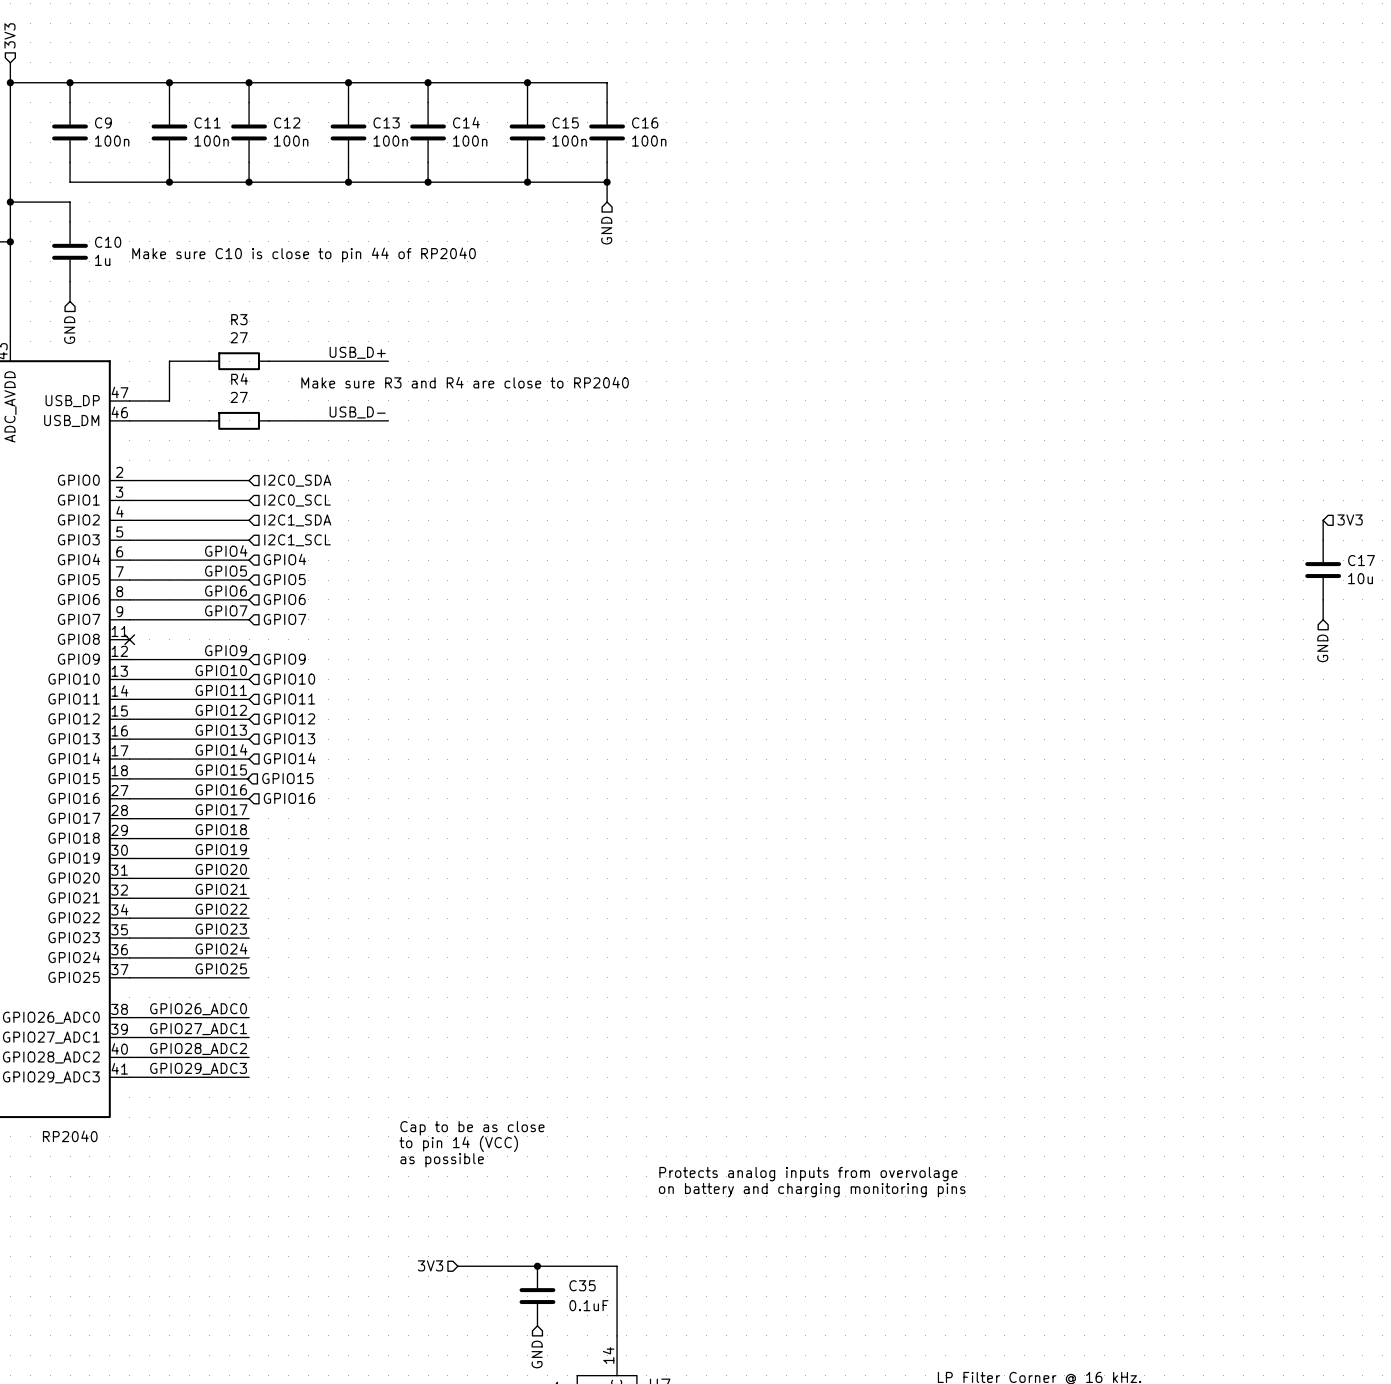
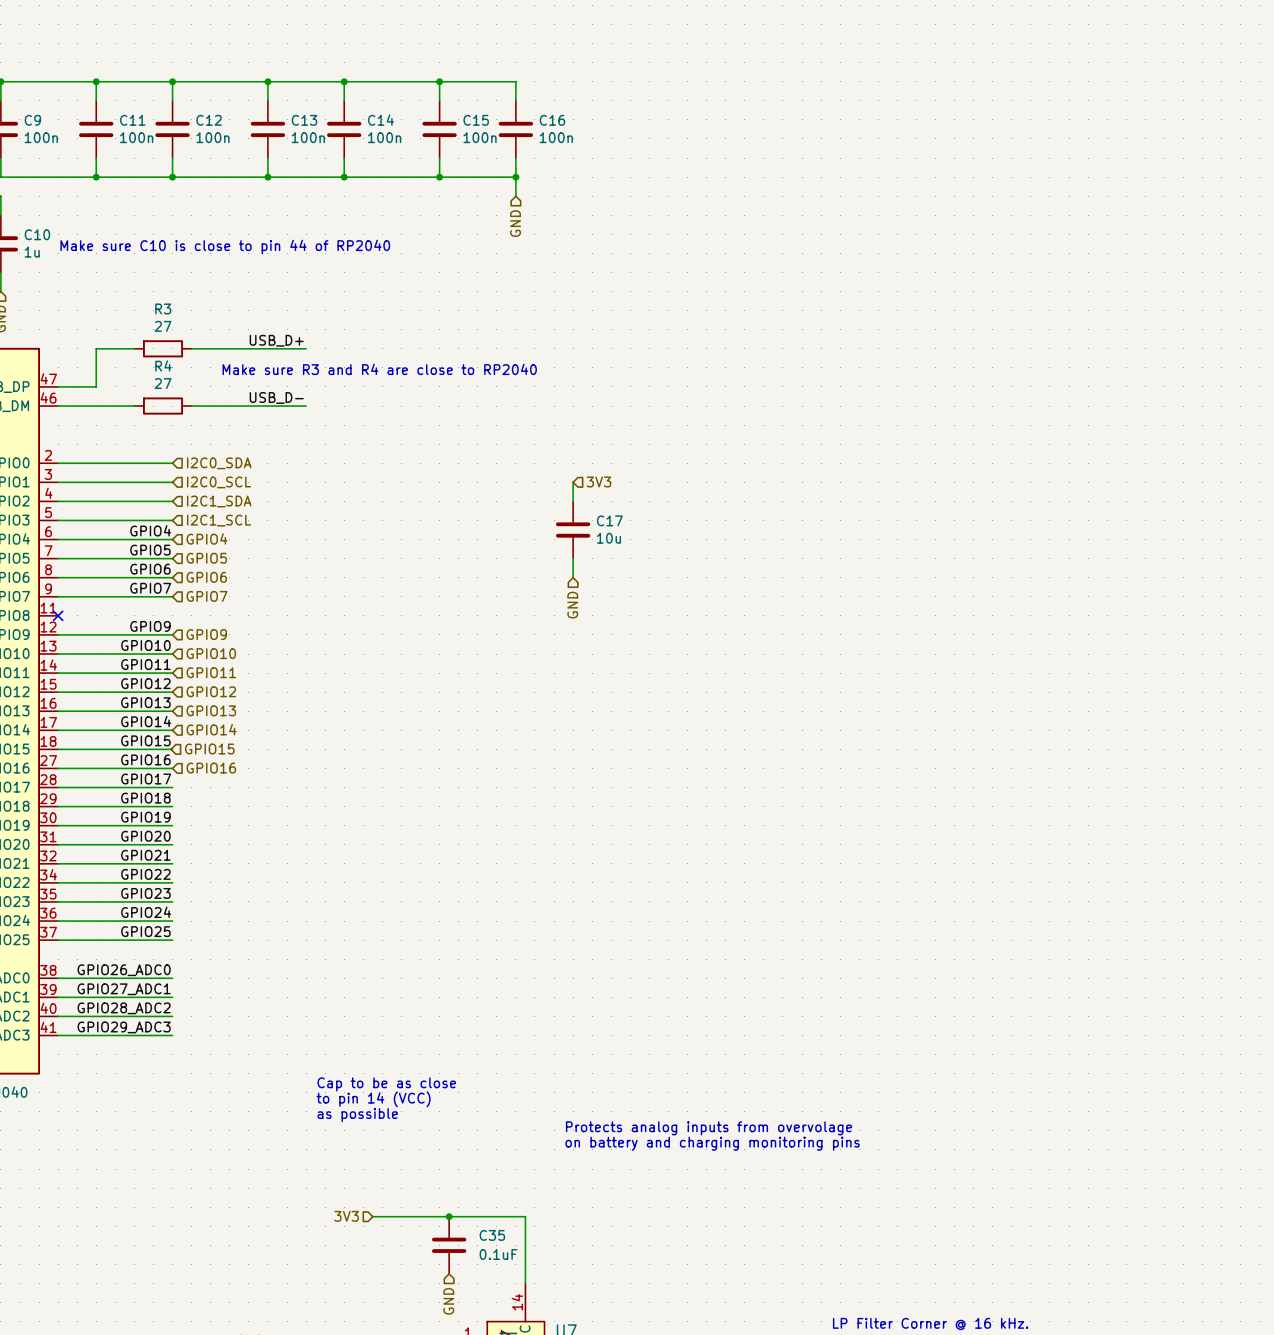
wire: none -> (573, 482) (573, 501)
hierarchical label: none -> 3V3 (598, 481)
hierarchical label: 3V3 (1350, 519) -> none
wire: (1323, 520) (1323, 540) -> none
C17 position: (1323, 570) -> (573, 530)
wire: none -> (573, 558) (573, 577)
wire: (1323, 599) (1323, 619) -> none
hierarchical label: none -> GND (572, 605)
hierarchical label: GND (1322, 648) -> none

